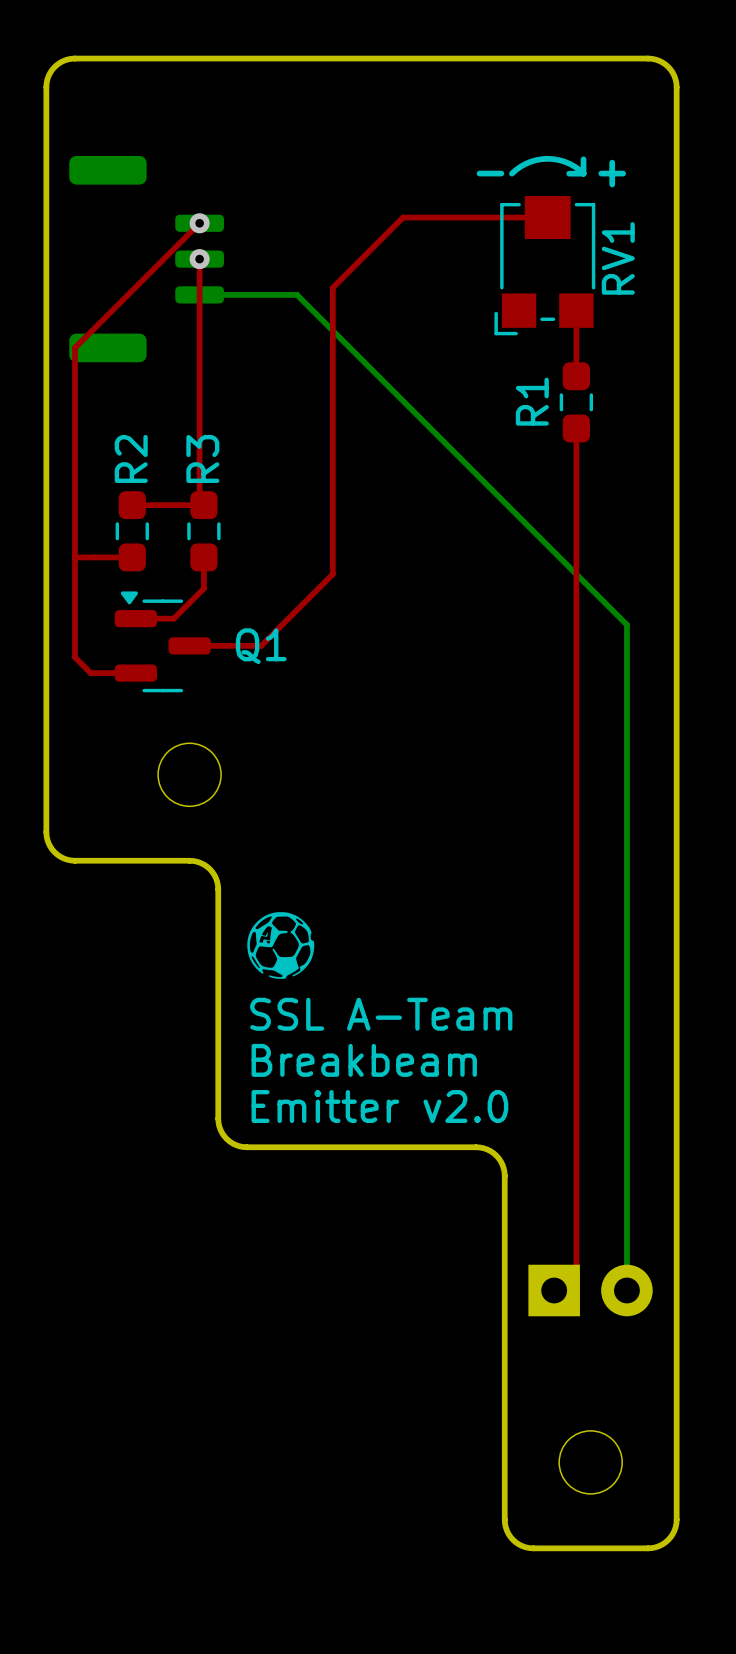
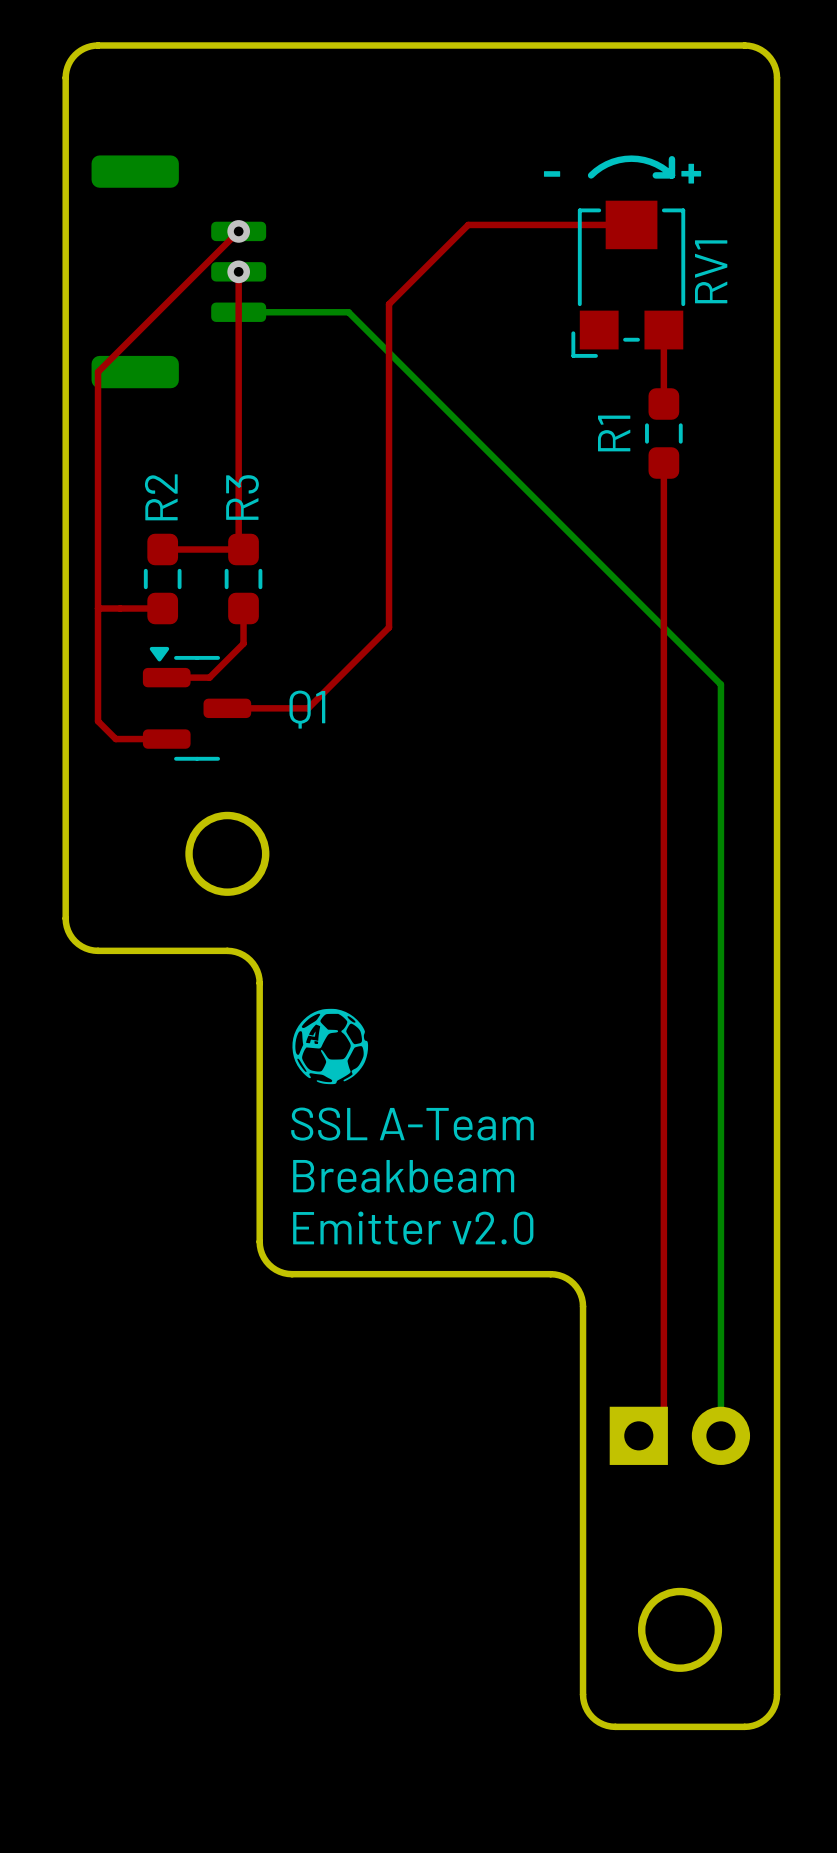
round board edge: none -> [185, 811, 270, 896]
round board edge: none -> [638, 1587, 723, 1672]

